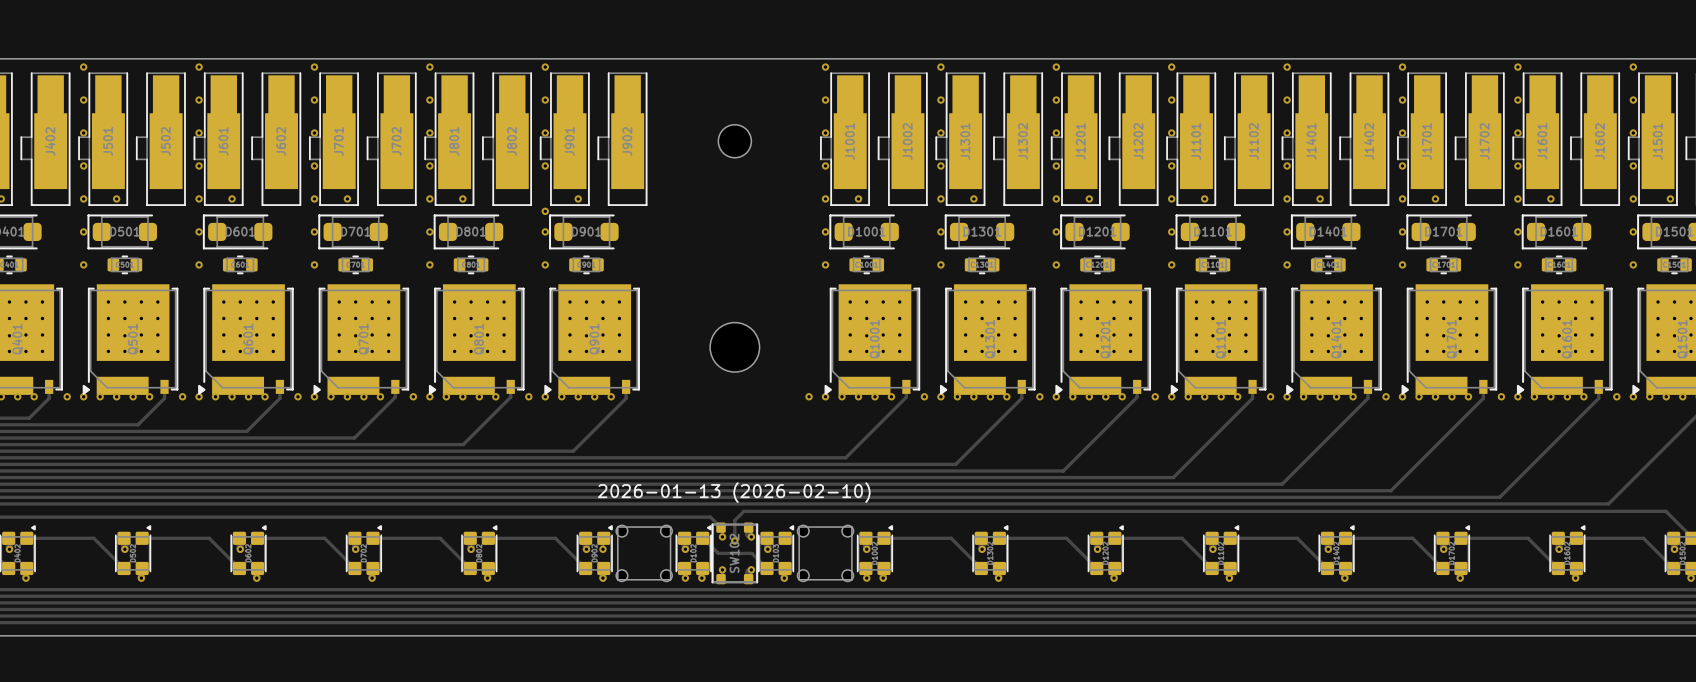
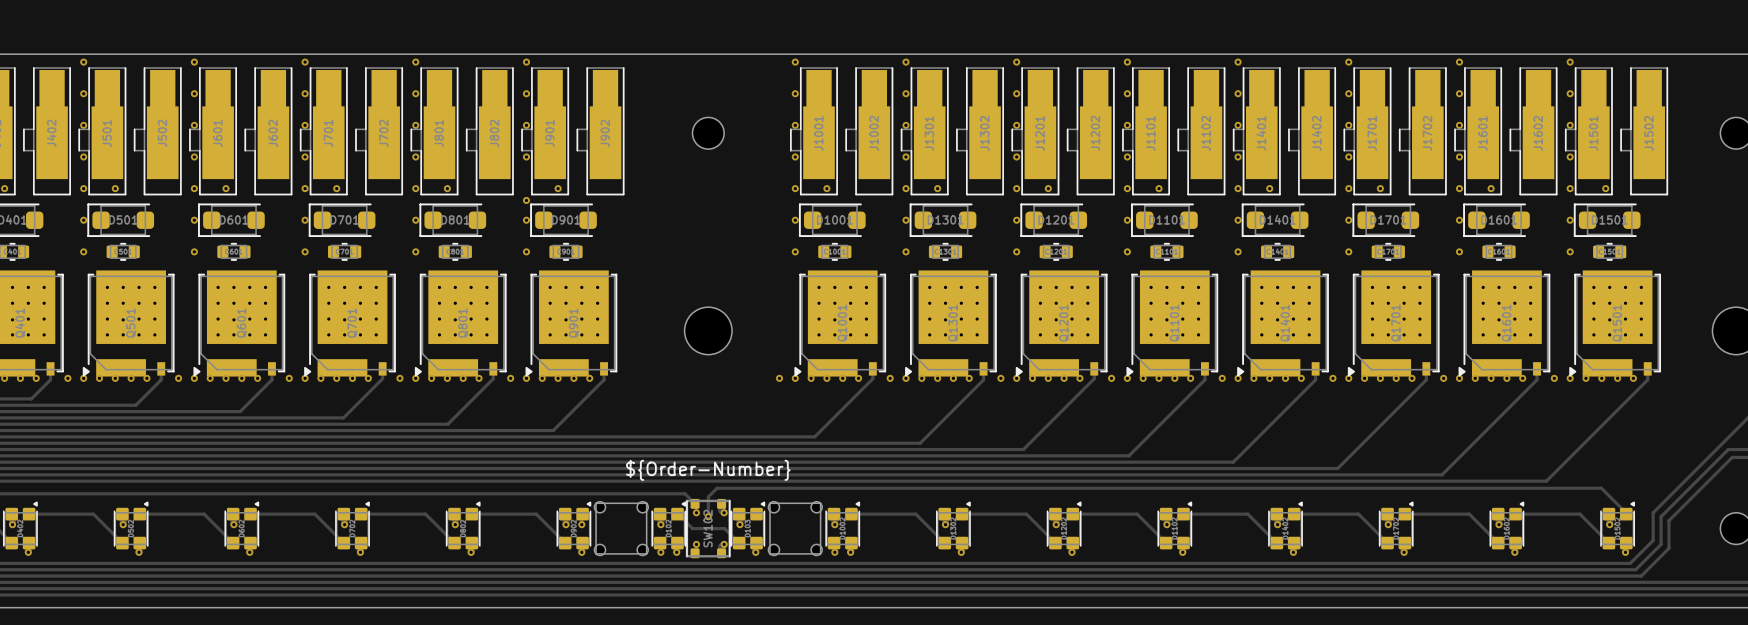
drawing shape: [598, 482, 871, 503] -> [626, 459, 791, 481]

